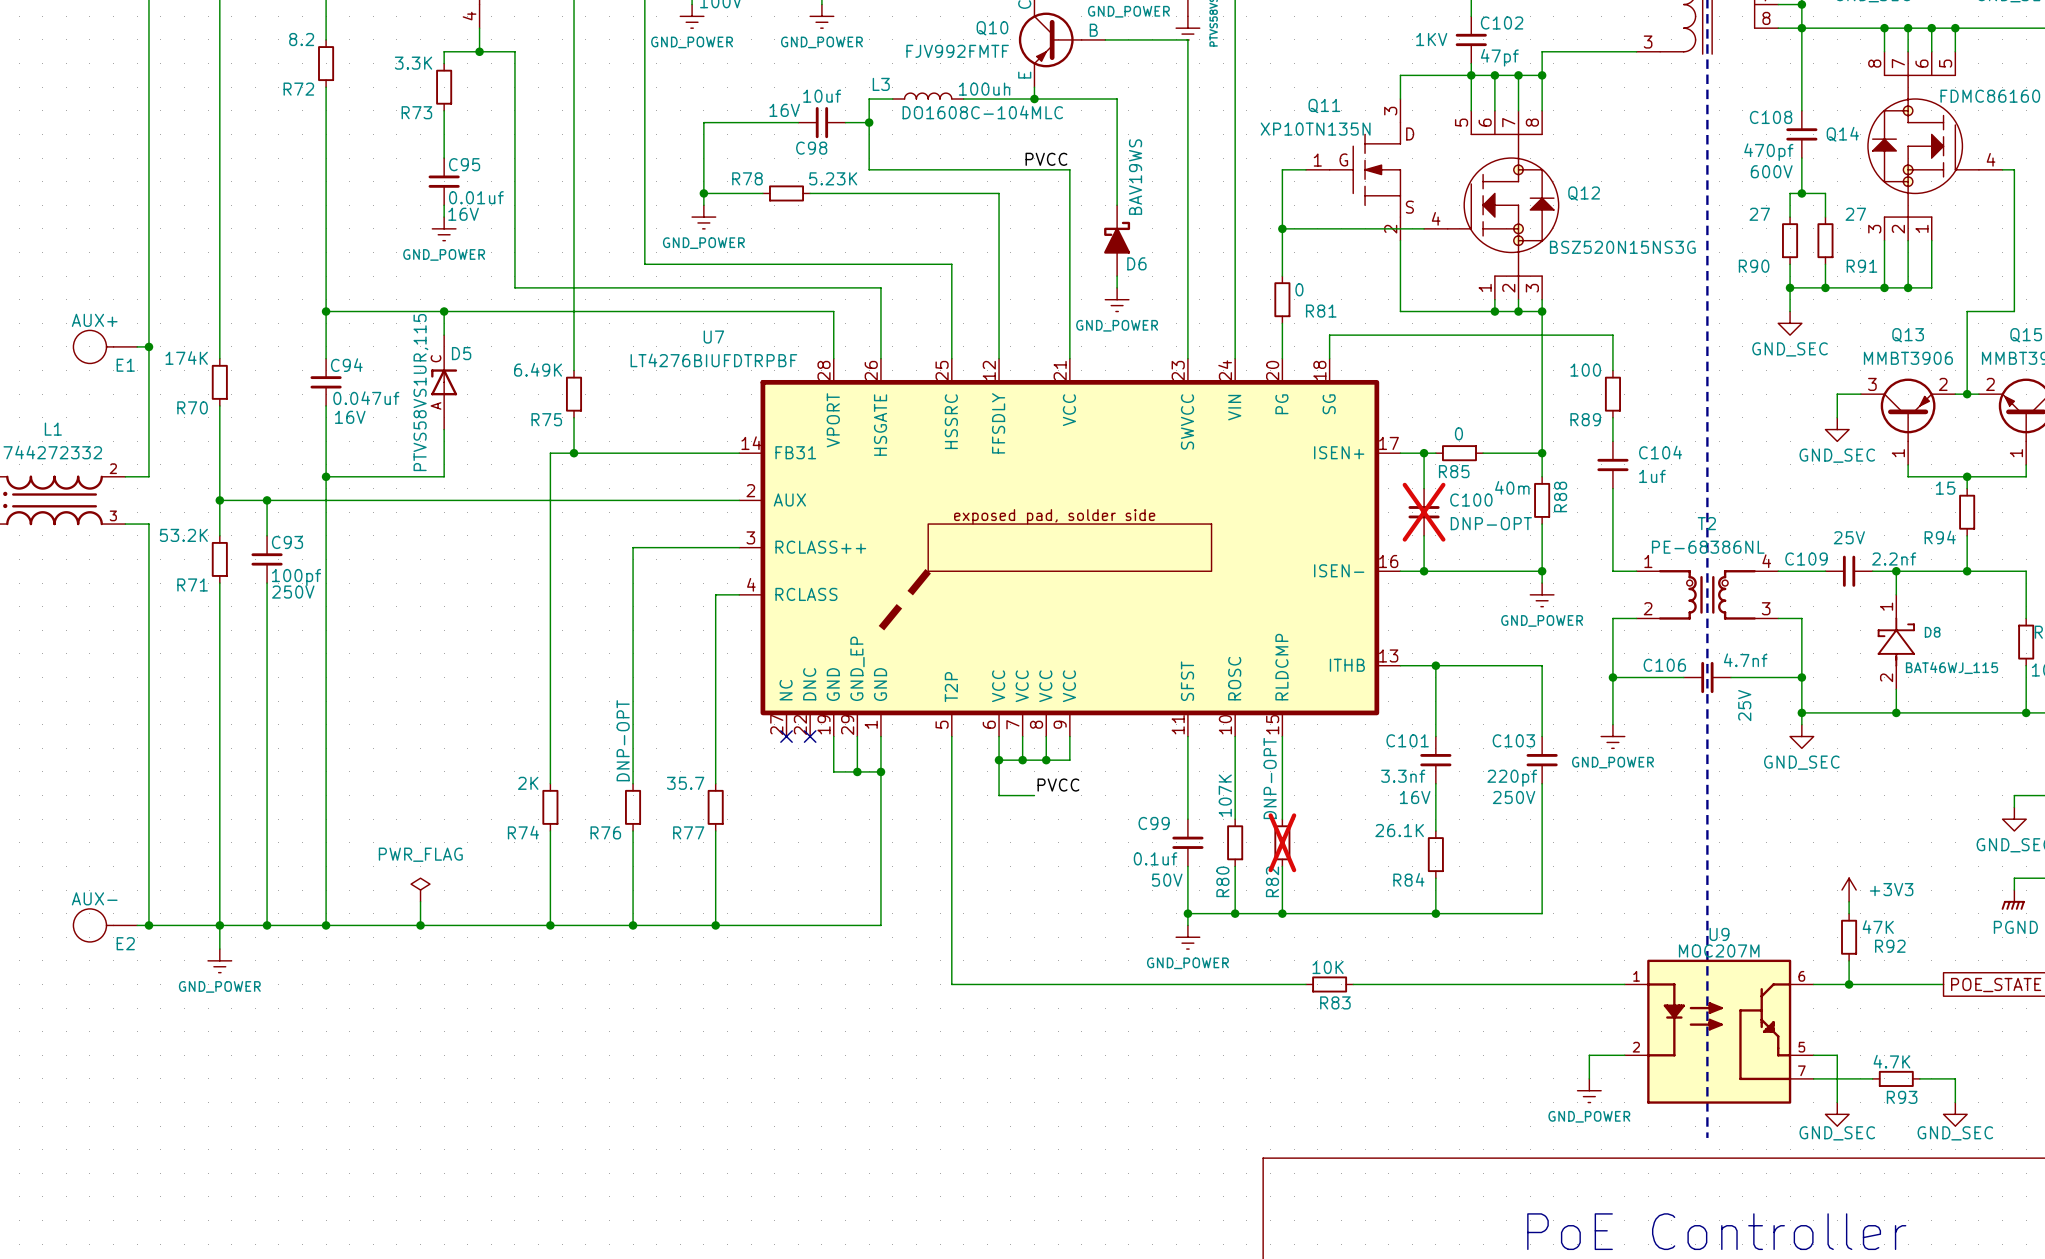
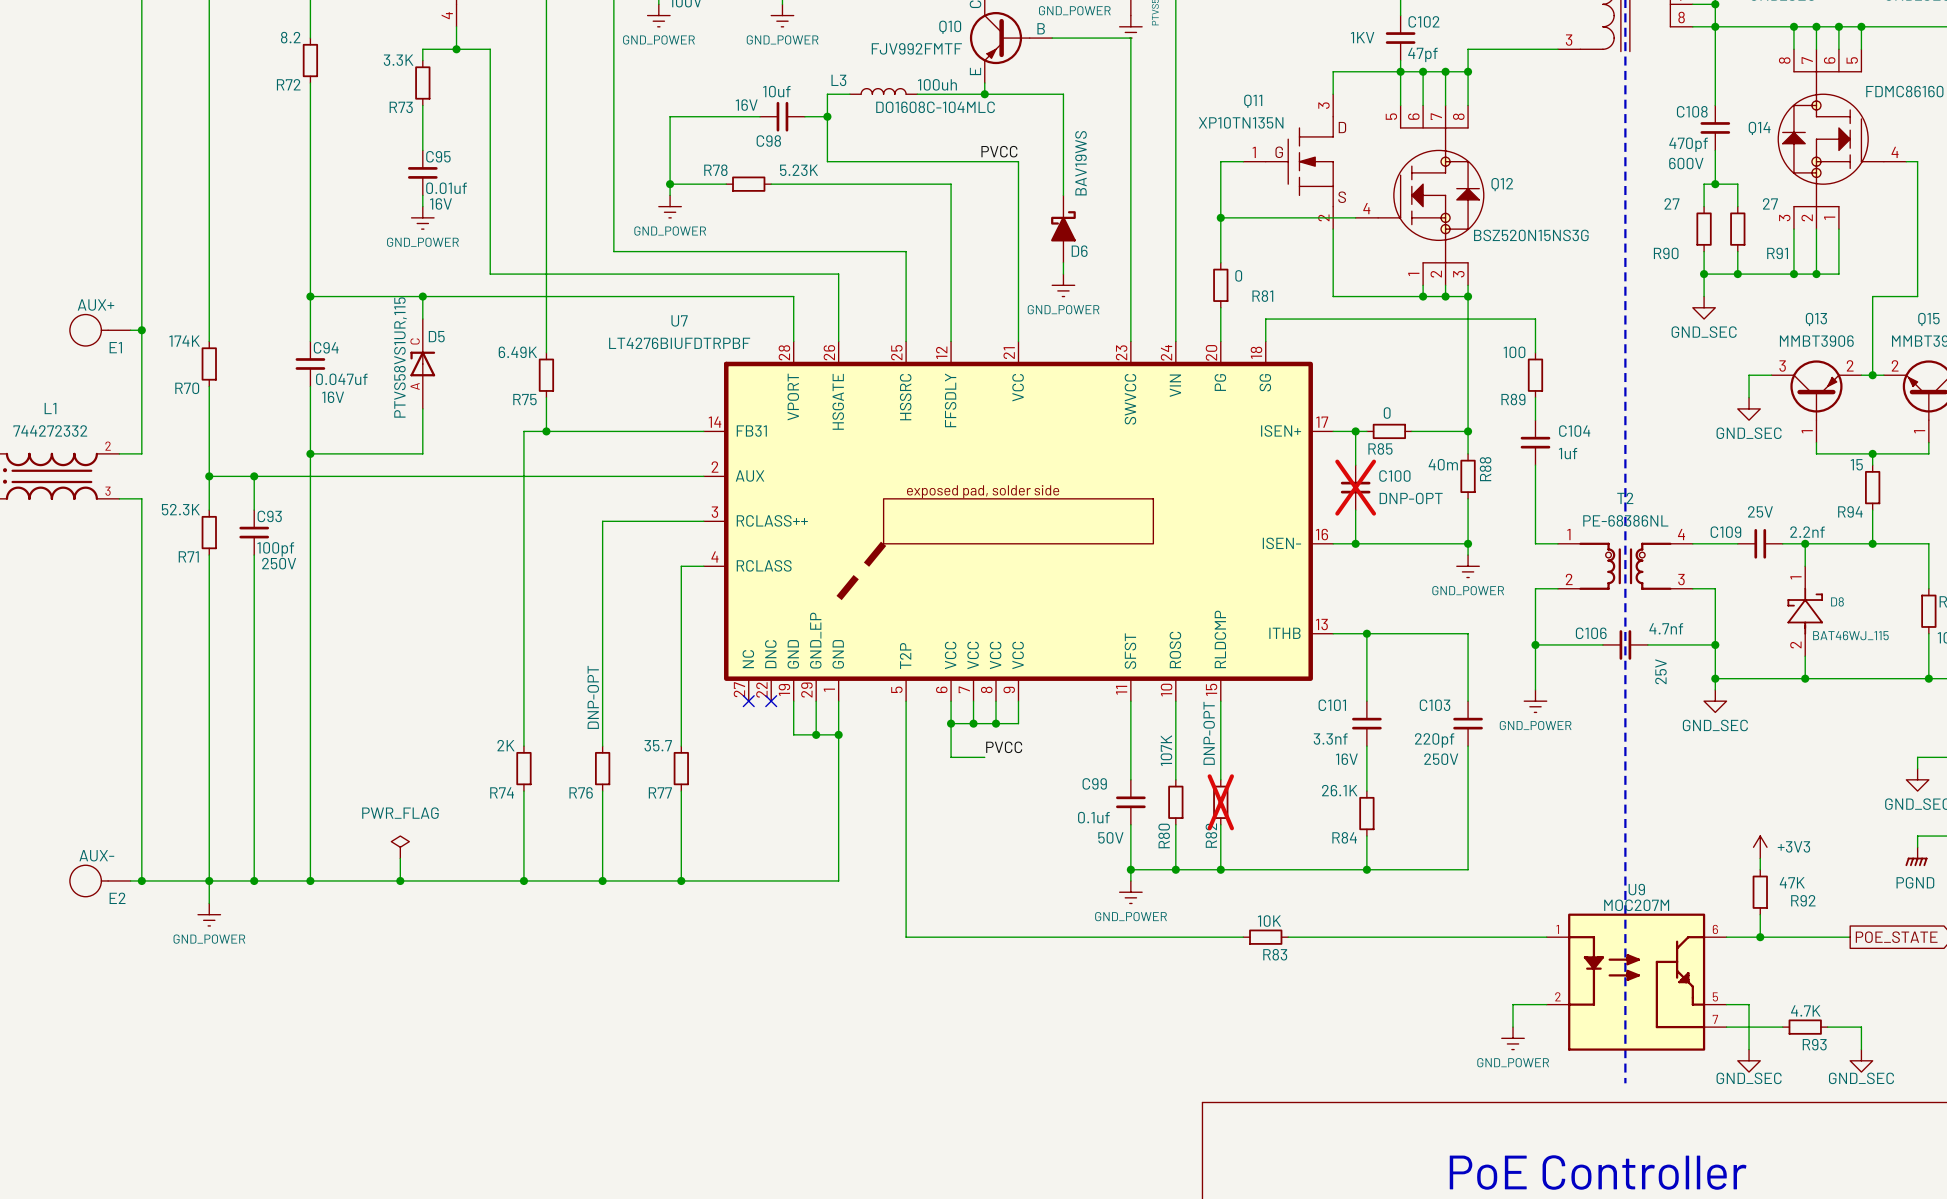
R71 value: 53.2K (183, 535) -> 52.3K (180, 509)

